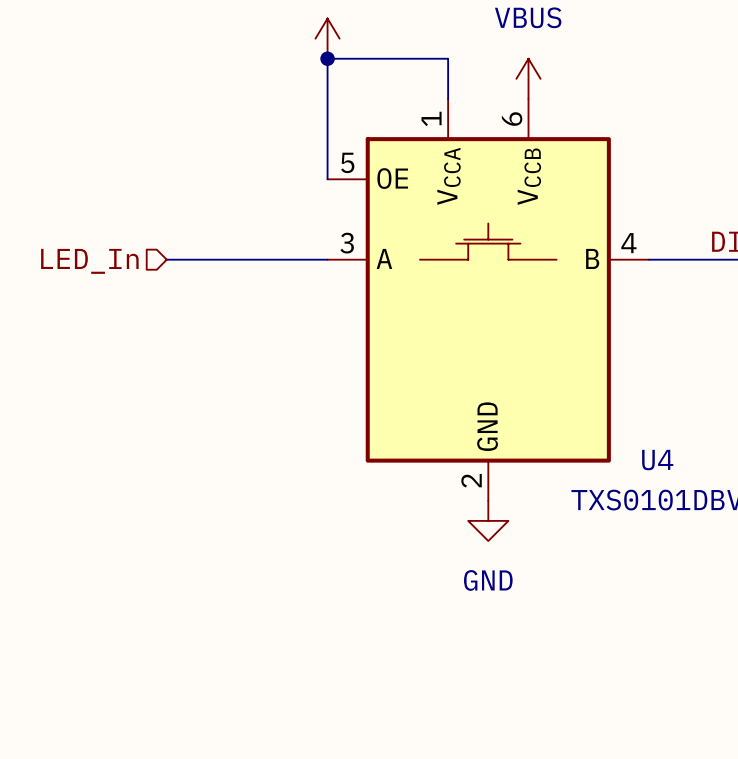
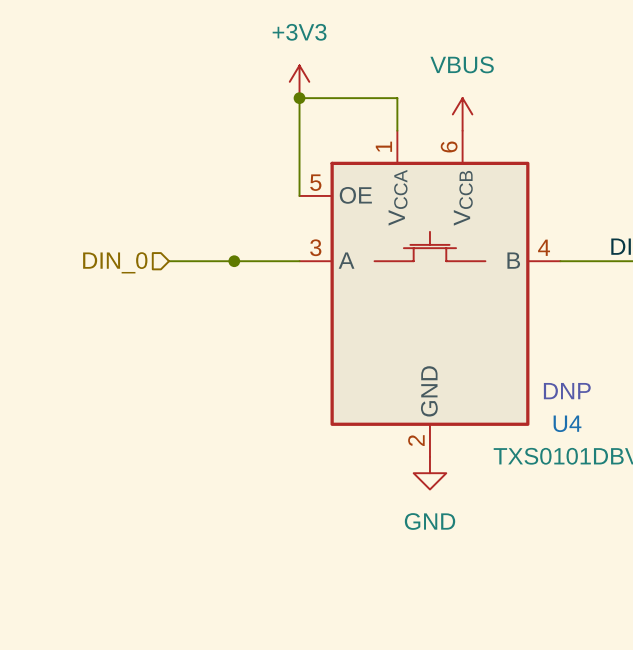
junction: none -> (234, 261)
hierarchical label: LED_In (89, 261) -> DIN_0 (115, 262)
text: none -> DNP (567, 391)

